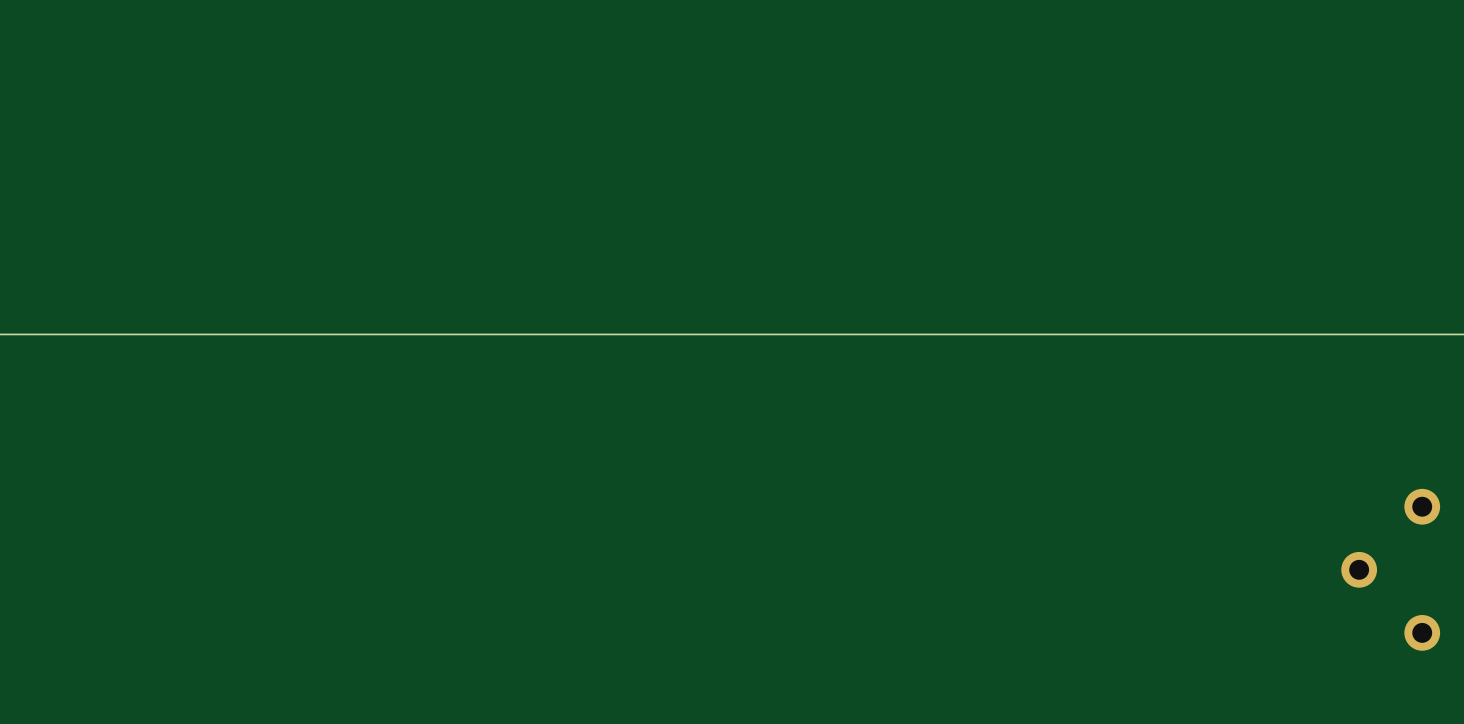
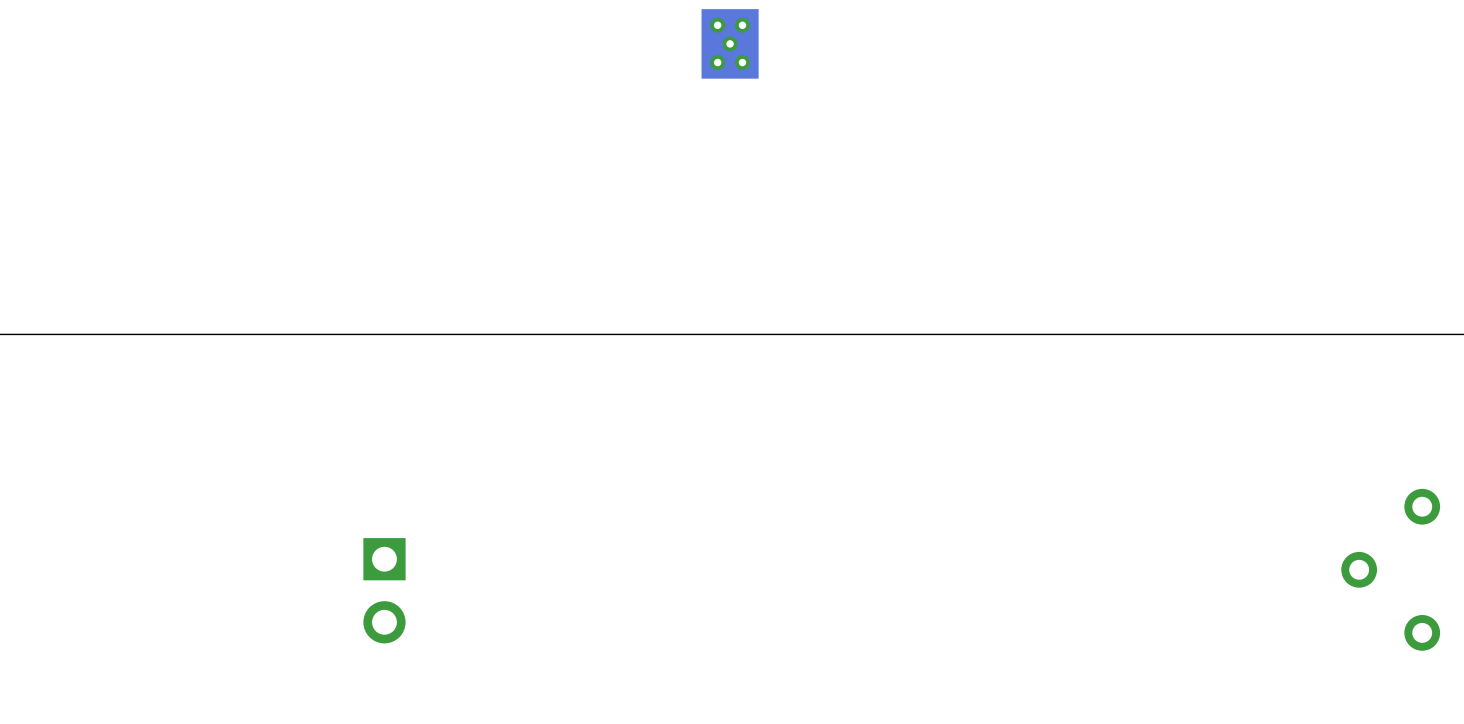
part: none -> (730, 43)
part: none -> (384, 590)

